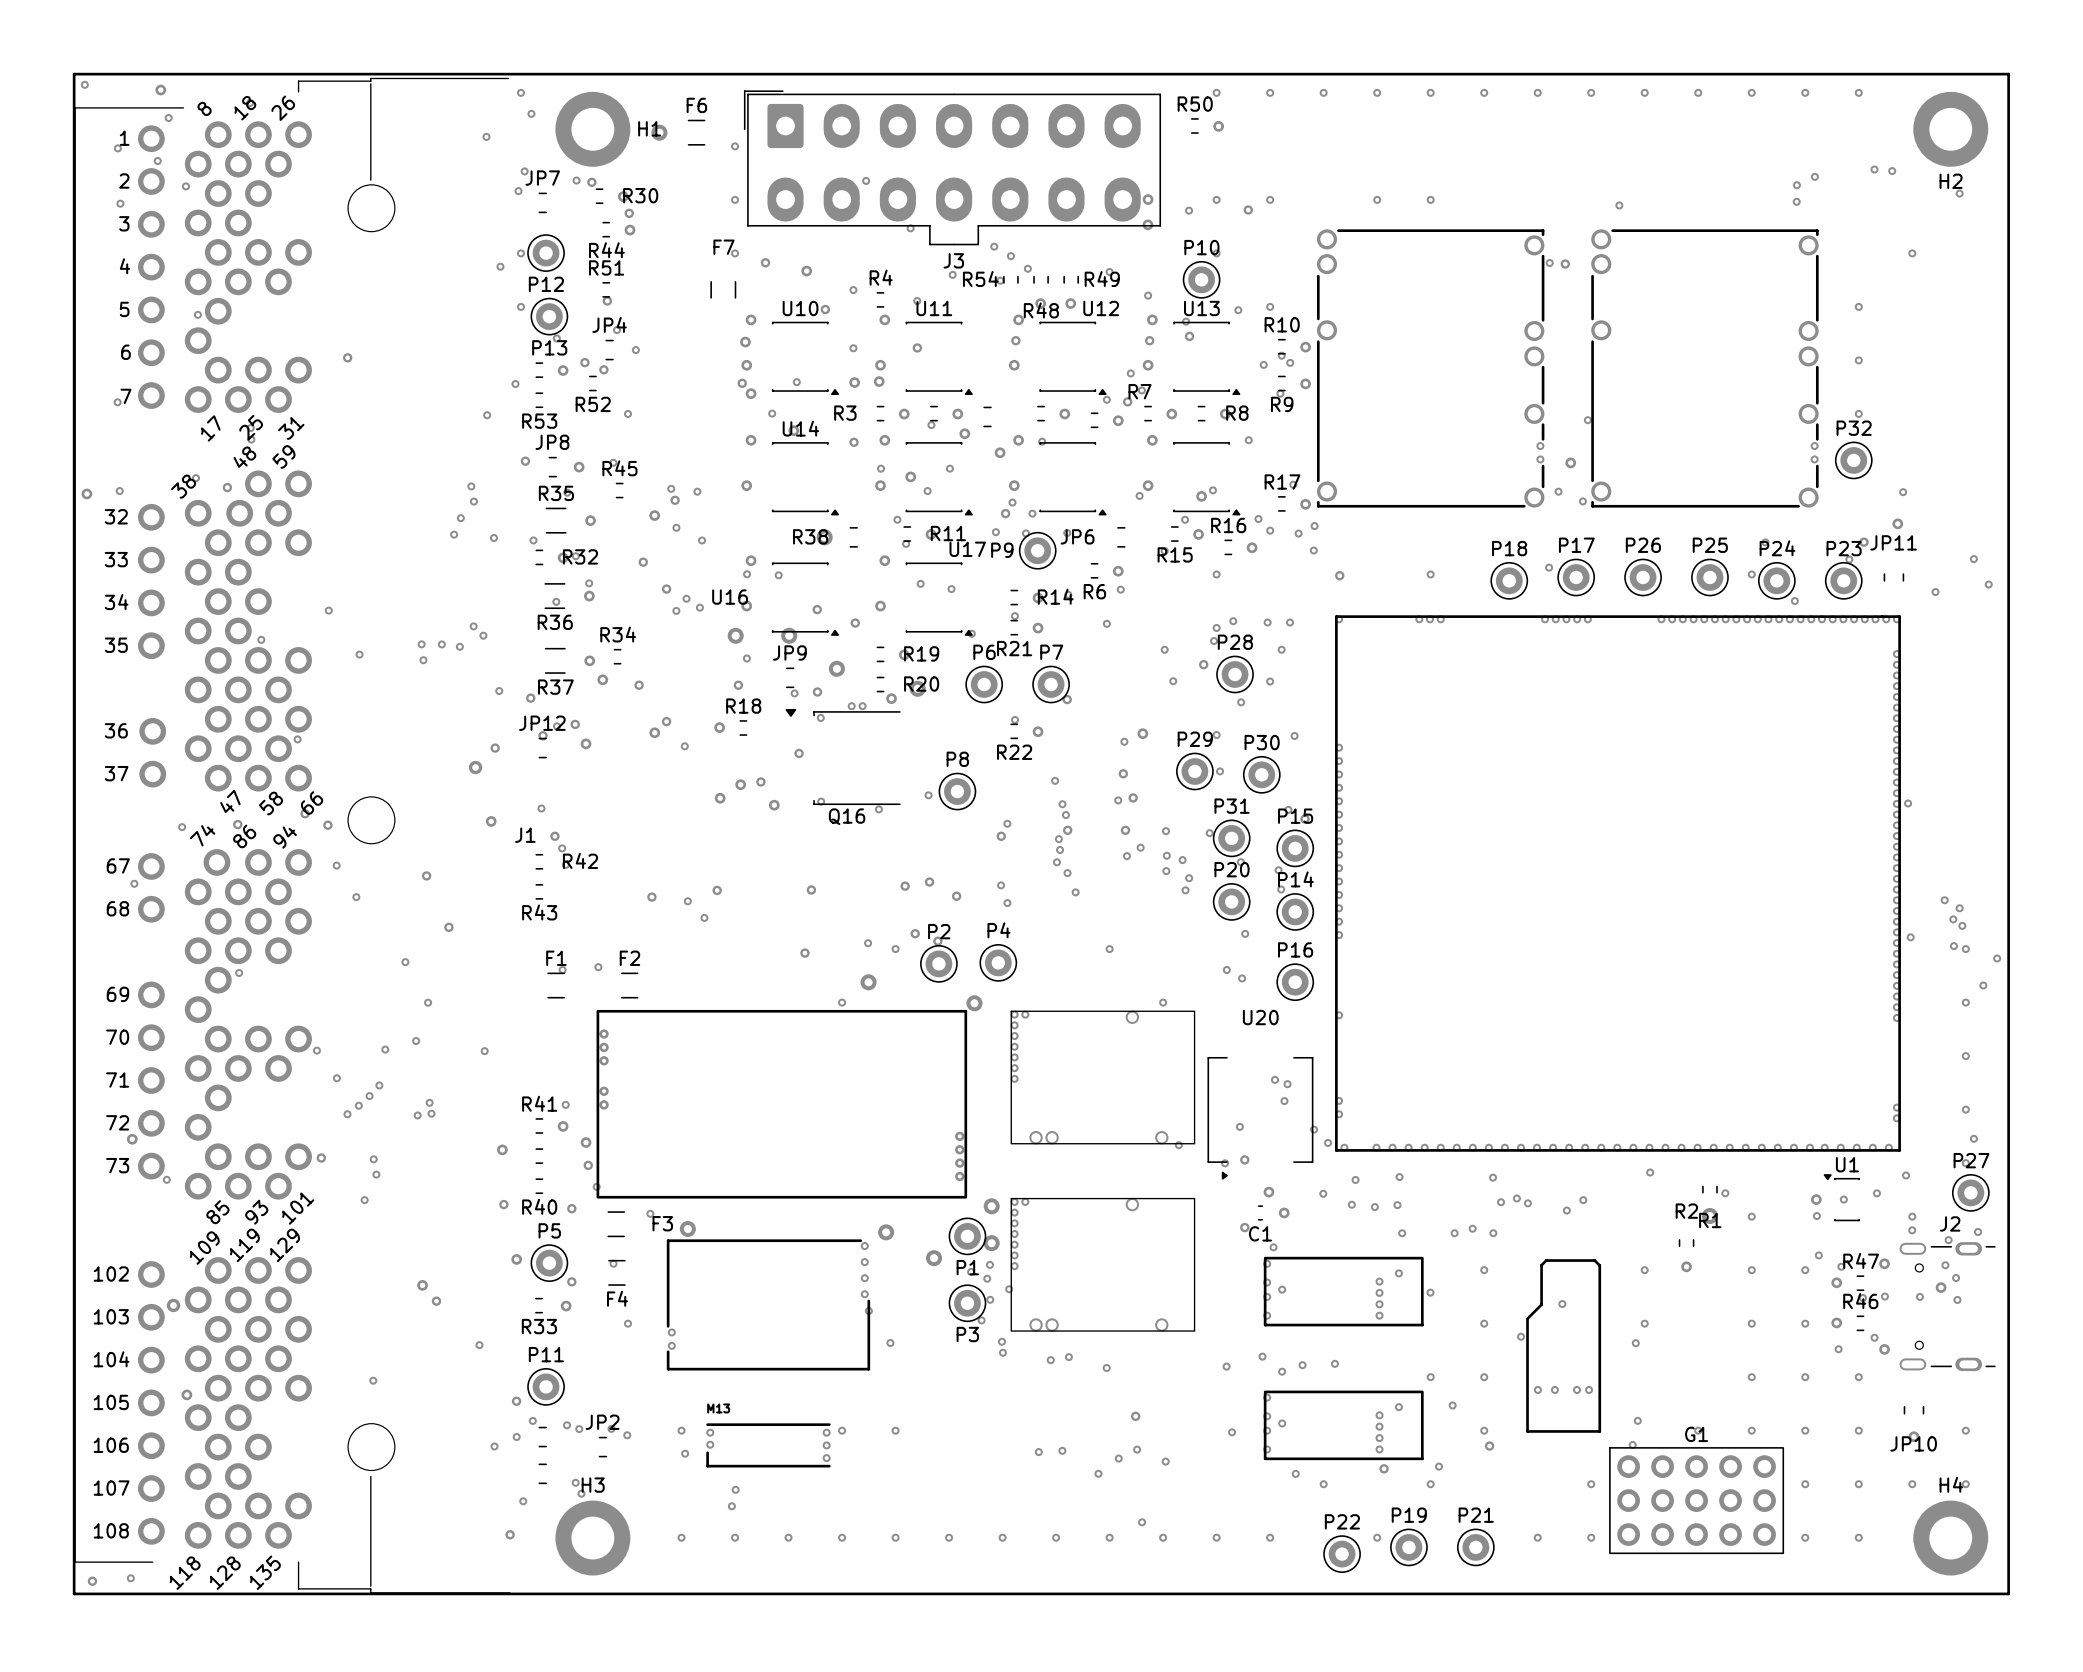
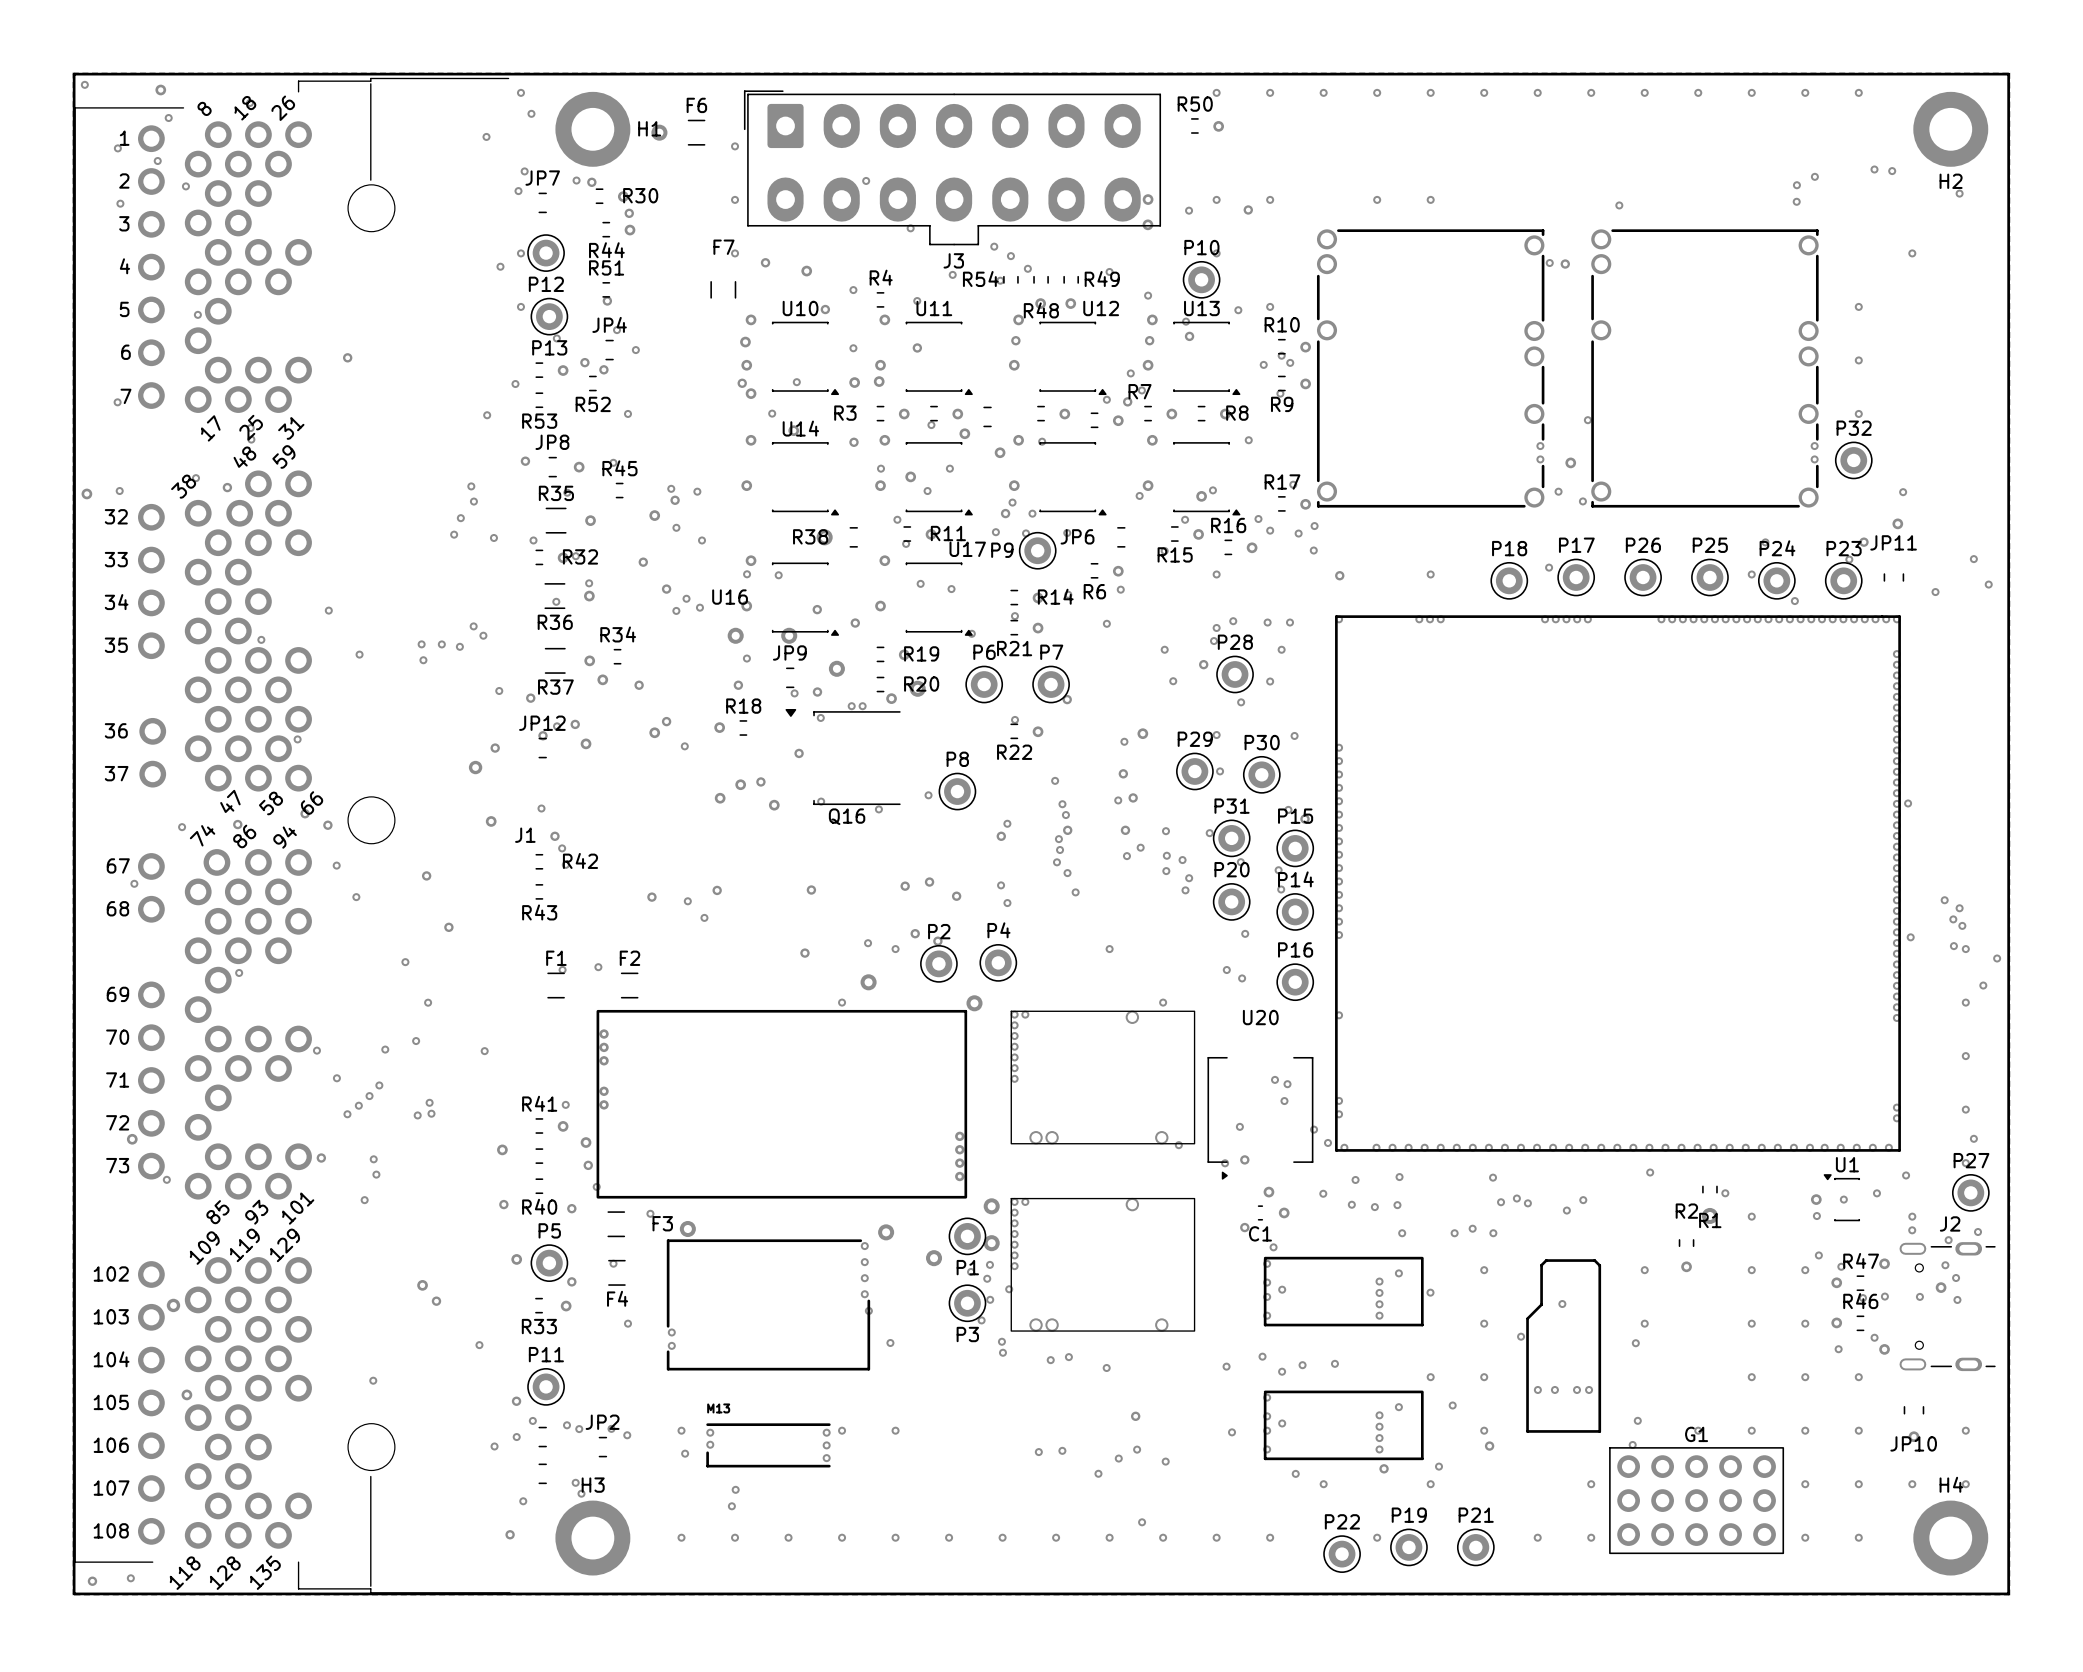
zone outline: none -> (72, 72) (2009, 72) (2009, 1595) (72, 1595) (72, 72)

